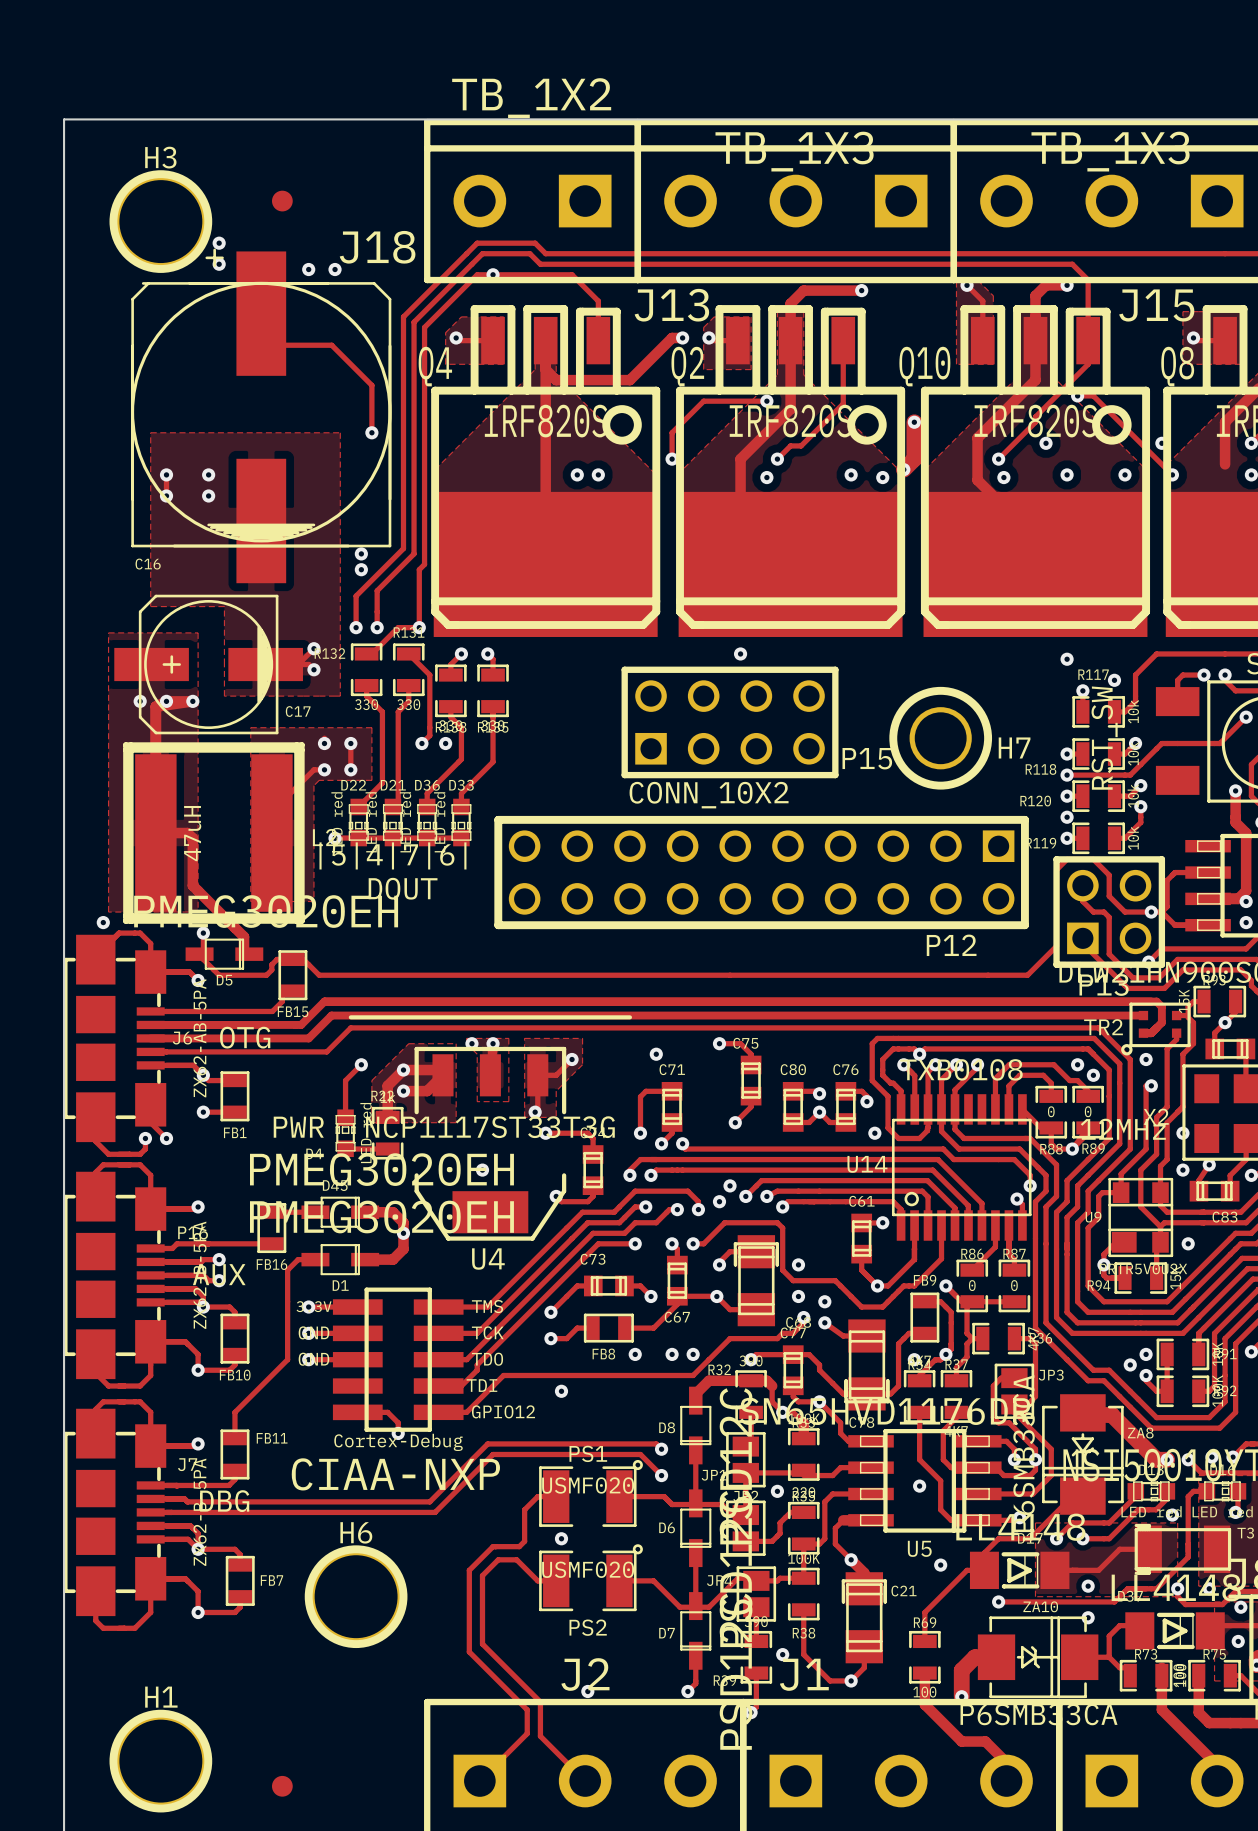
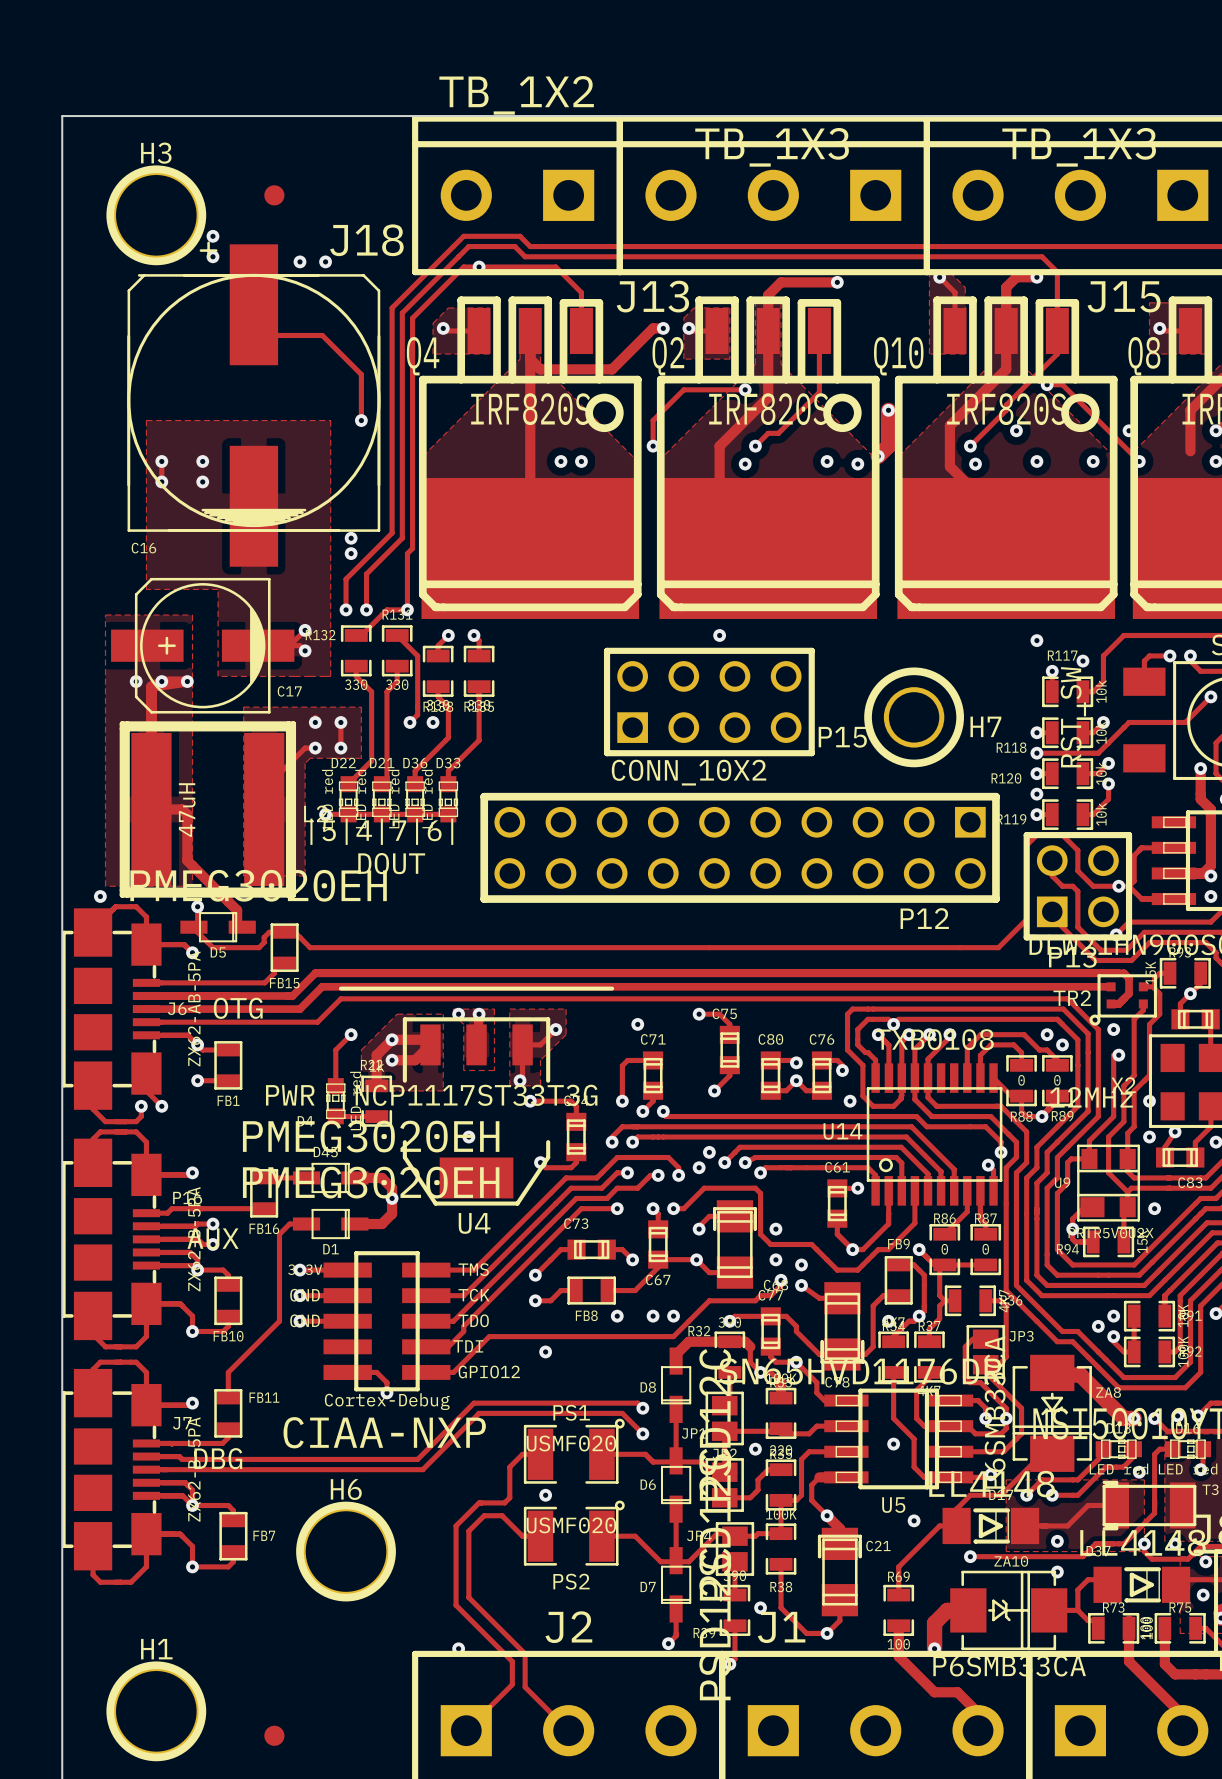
via position: (587, 1691) -> (458, 1648)

